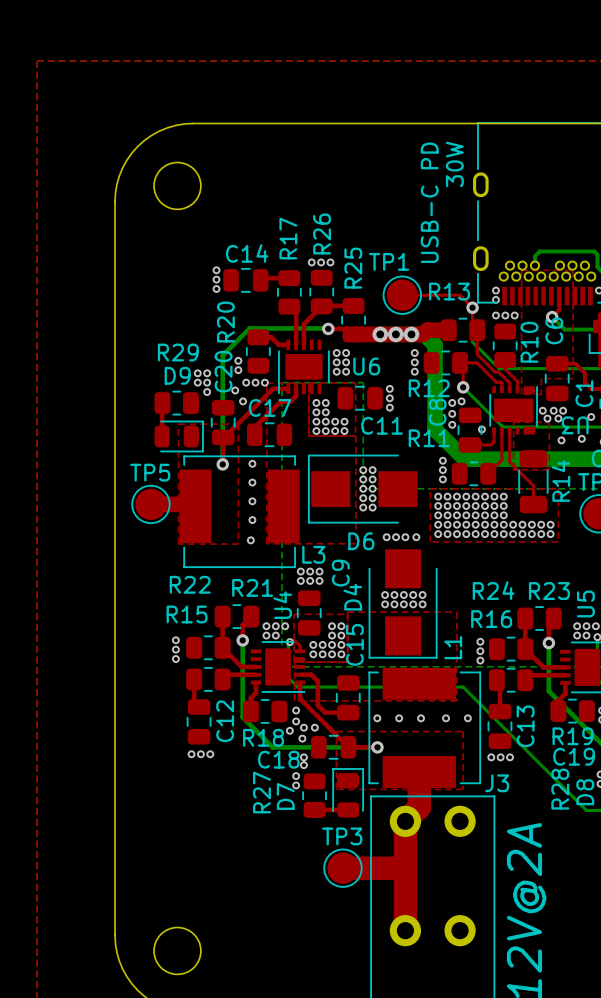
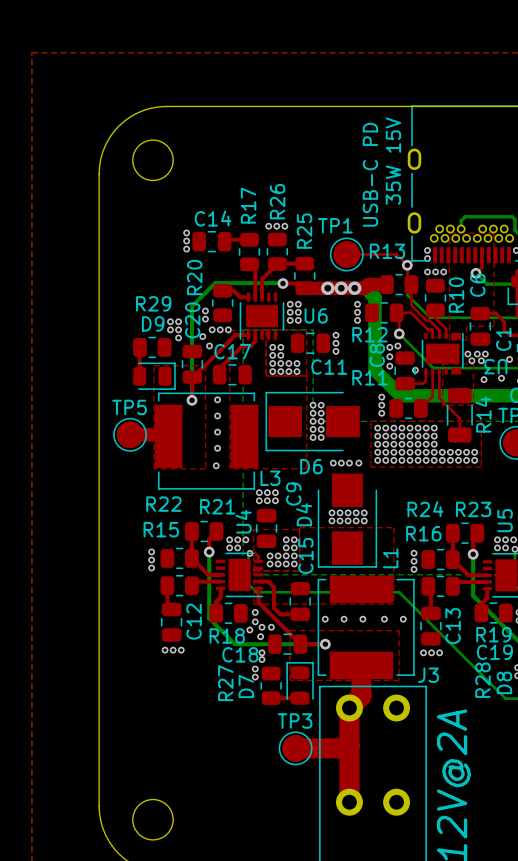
text: 30W (454, 164) -> 35W 15V (393, 161)

